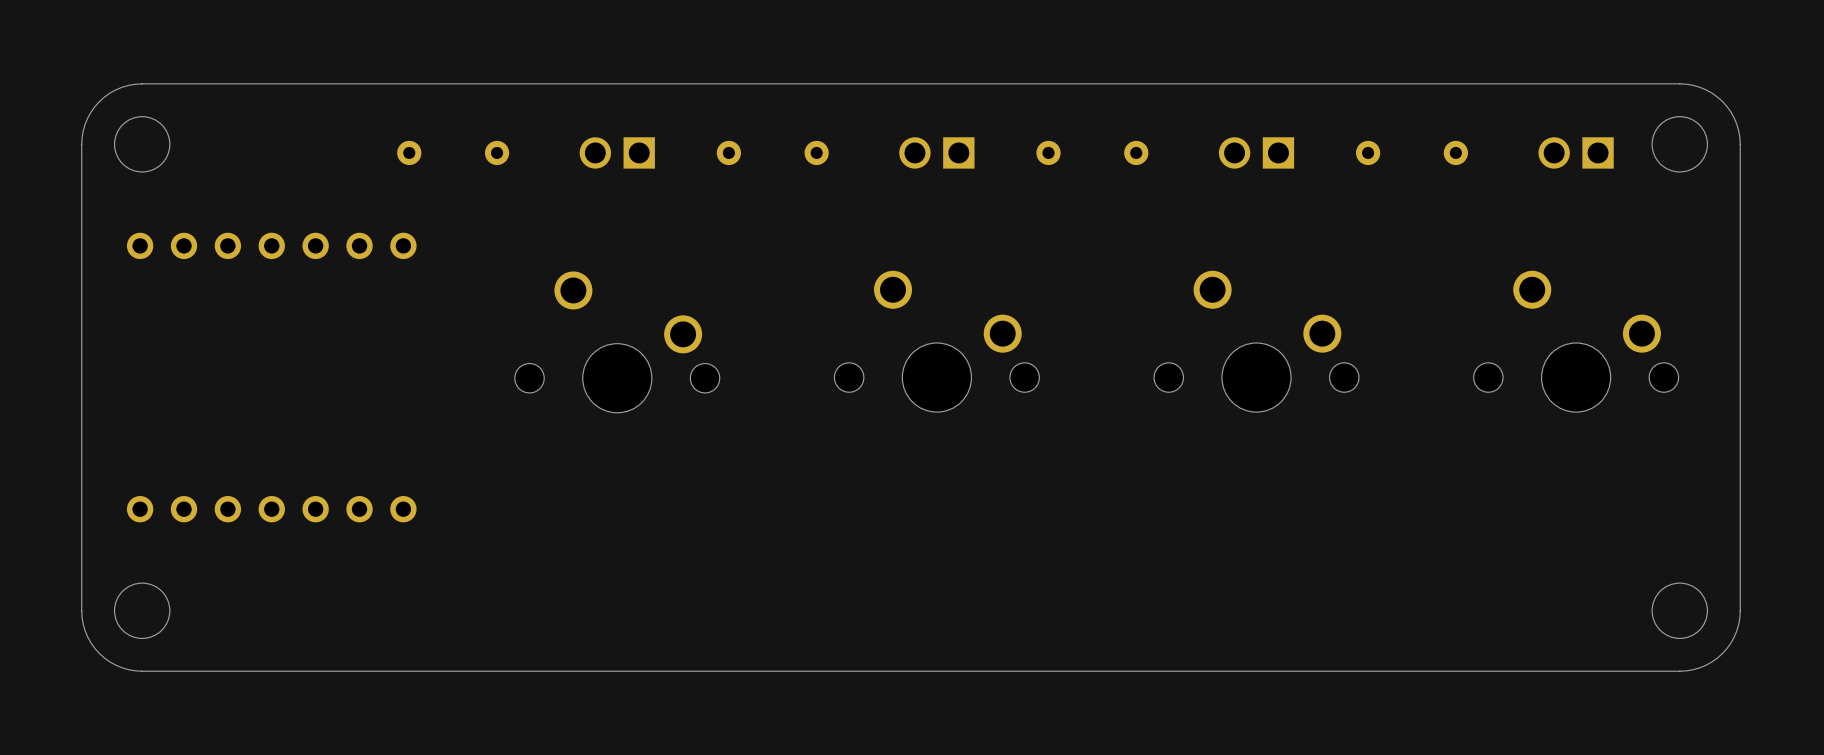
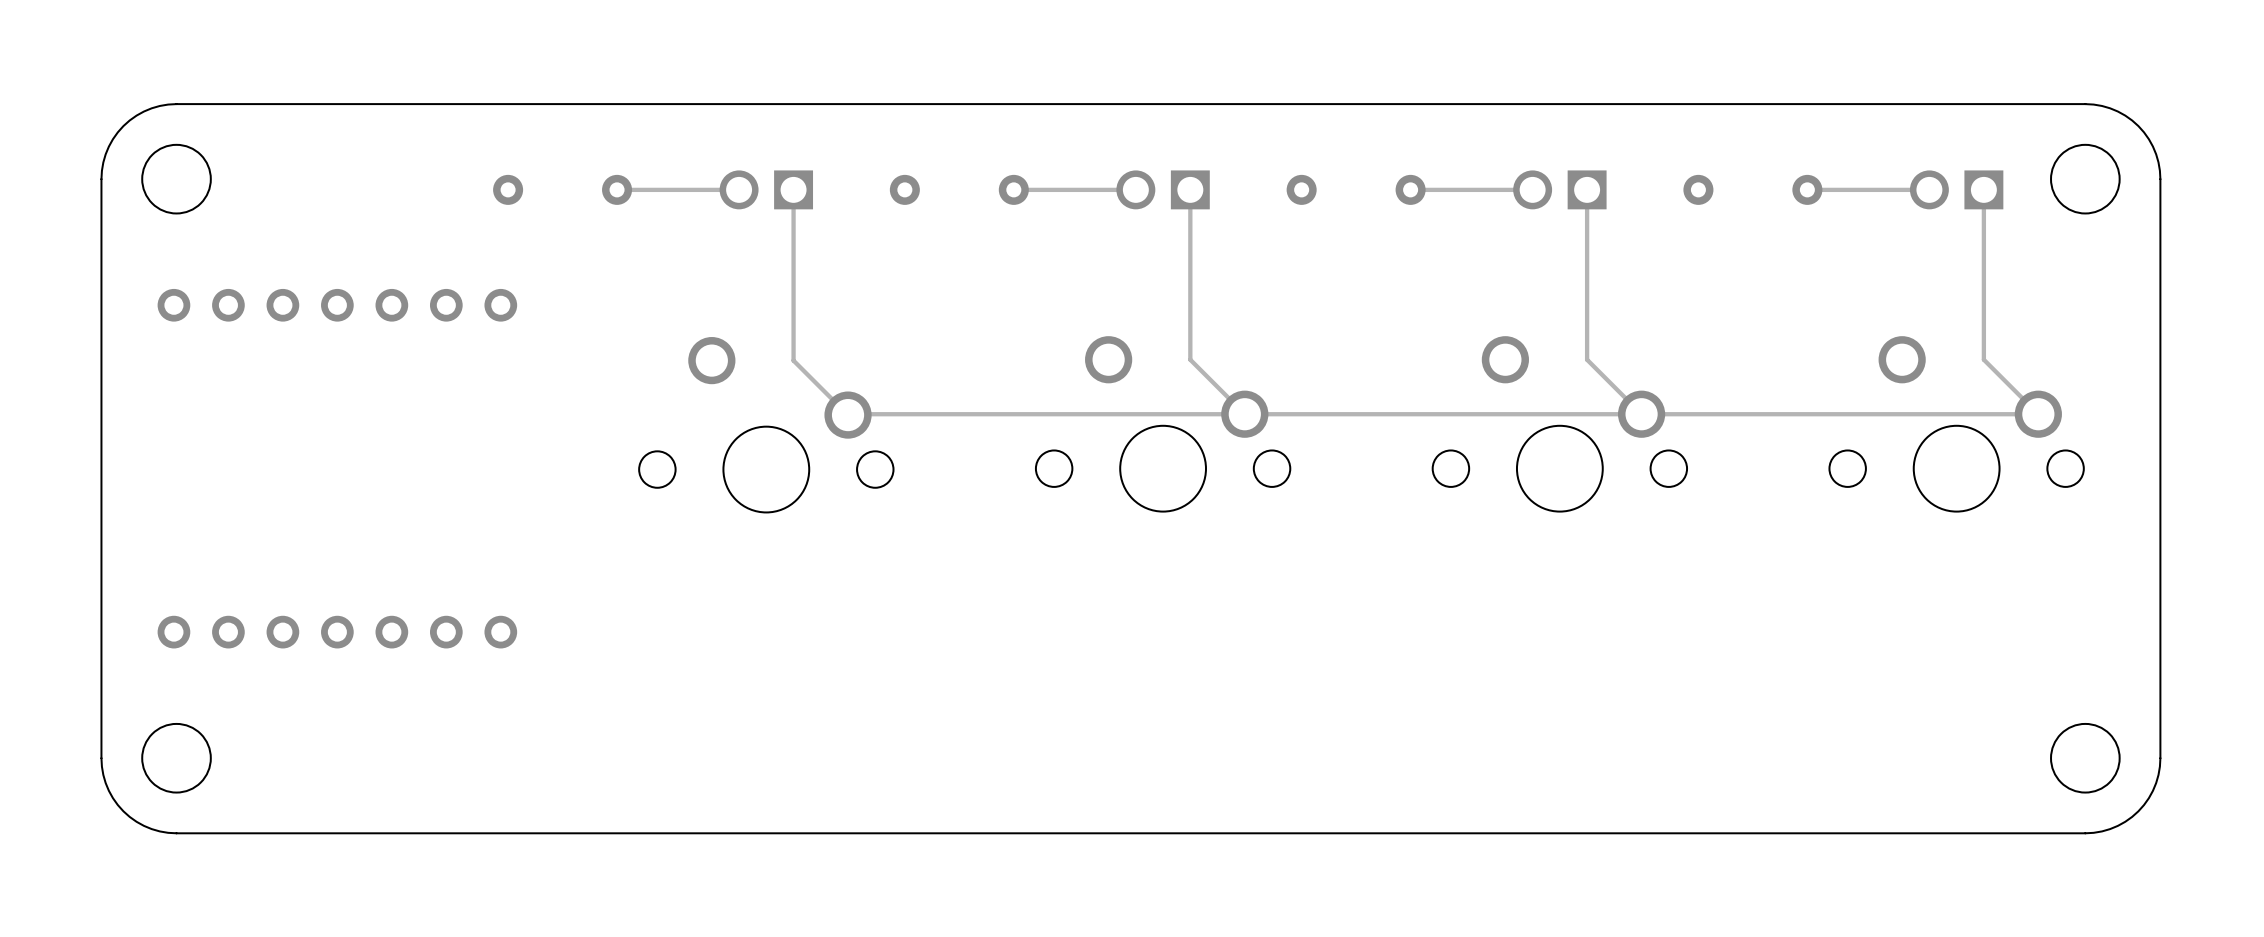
track: none -> (739, 189) (617, 189)
track: none -> (1135, 189) (1013, 189)
track: none -> (1190, 189) (1190, 359) (1244, 414)
track: none -> (1532, 189) (1410, 189)
track: none -> (1587, 189) (1587, 359) (1641, 414)
track: none -> (1929, 189) (1807, 189)
track: none -> (1983, 189) (1983, 359) (2038, 414) (848, 415) (793, 360) (793, 189)

